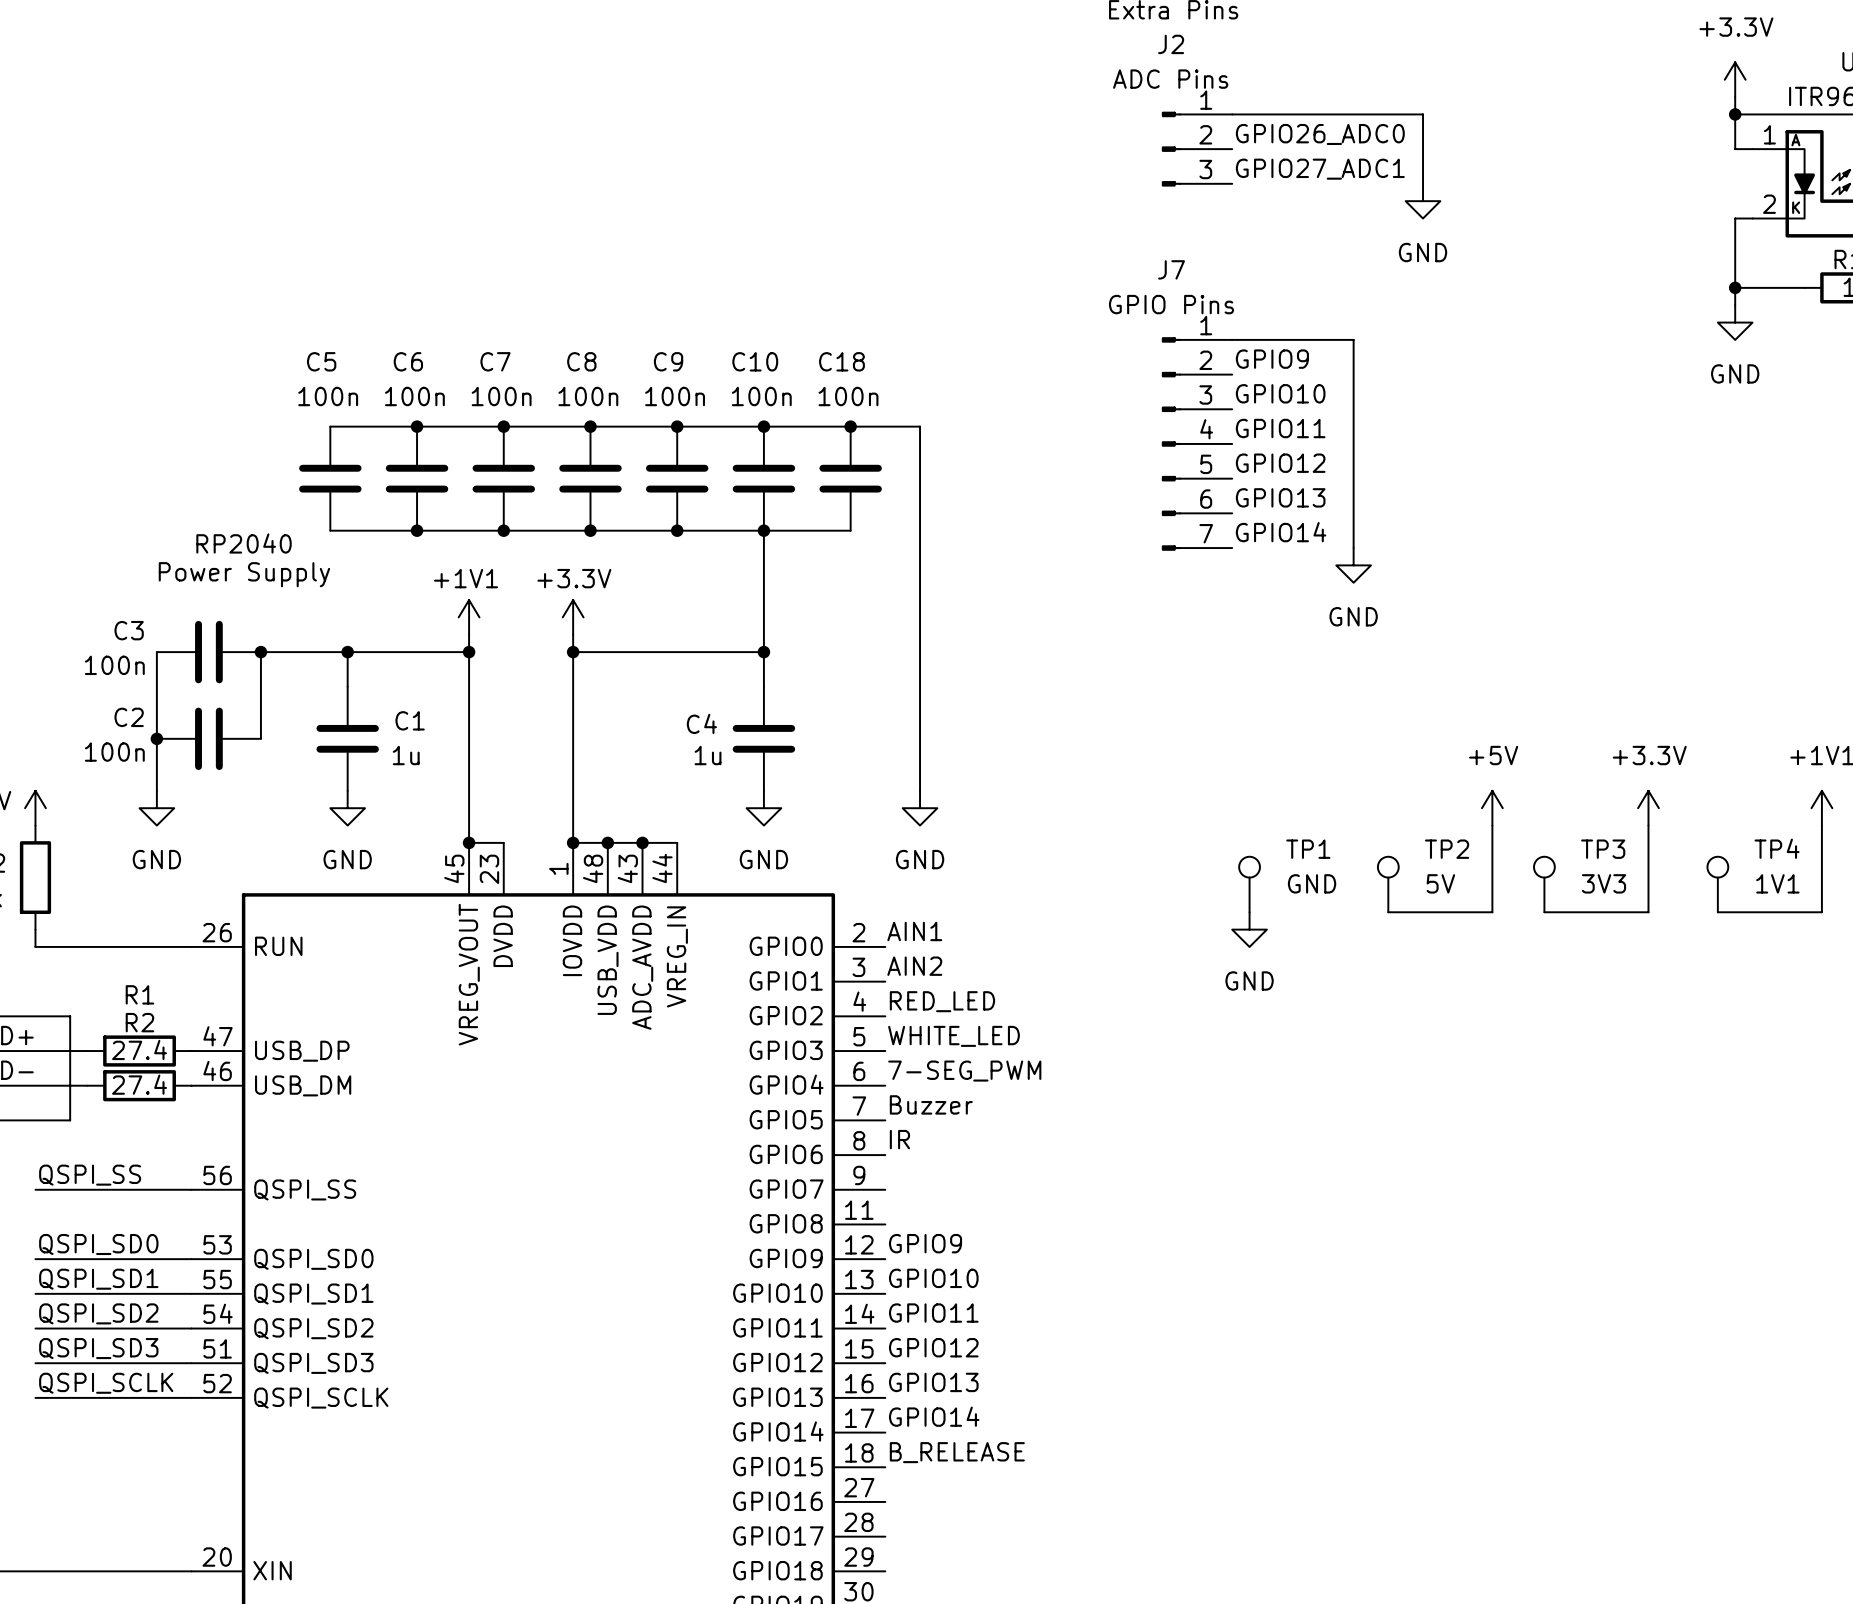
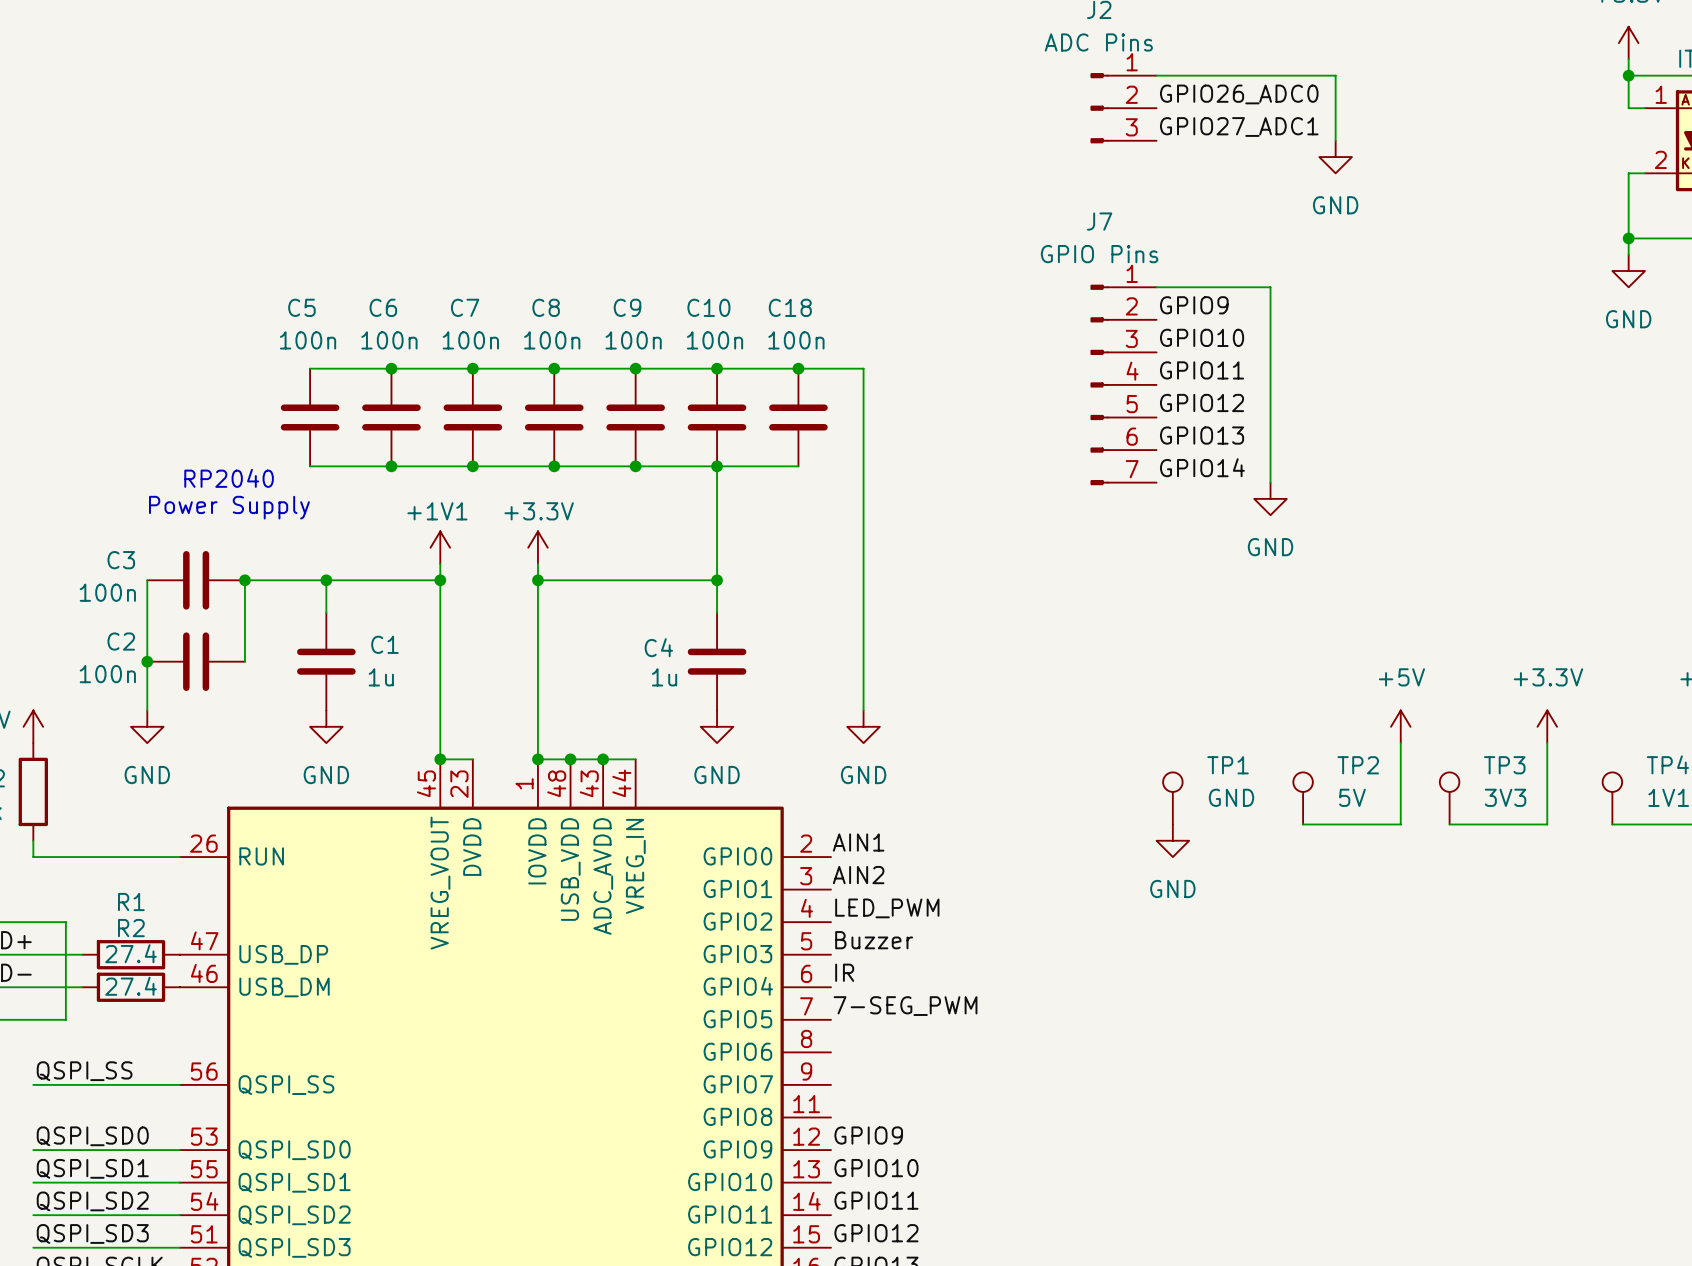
label: RED_LED (942, 1001) -> LED_PWM (887, 908)
label: WHITE_LED (954, 1036) -> Buzzer (874, 940)
label: 7-SEG_PWM (964, 1071) -> IR (844, 972)
label: Buzzer (931, 1104) -> 7-SEG_PWM (905, 1006)
label: IR (899, 1139) -> none

